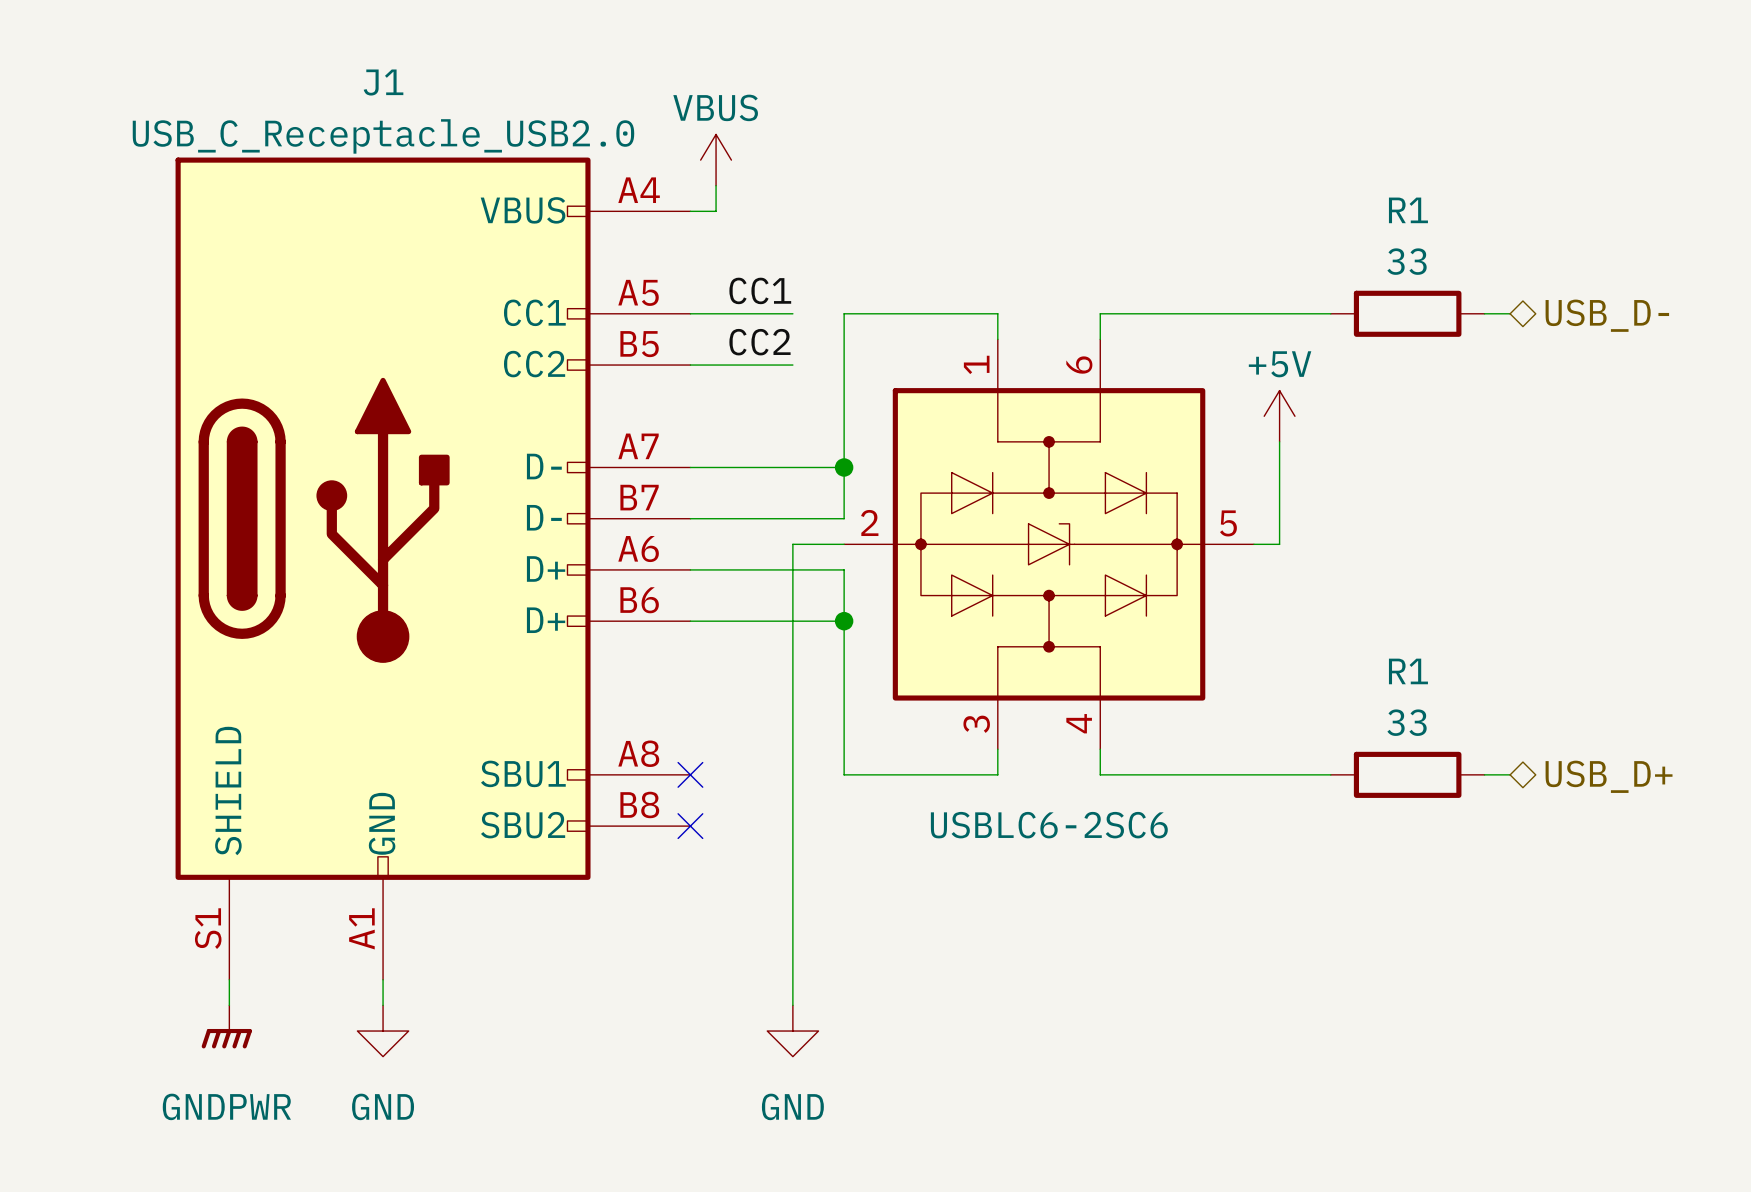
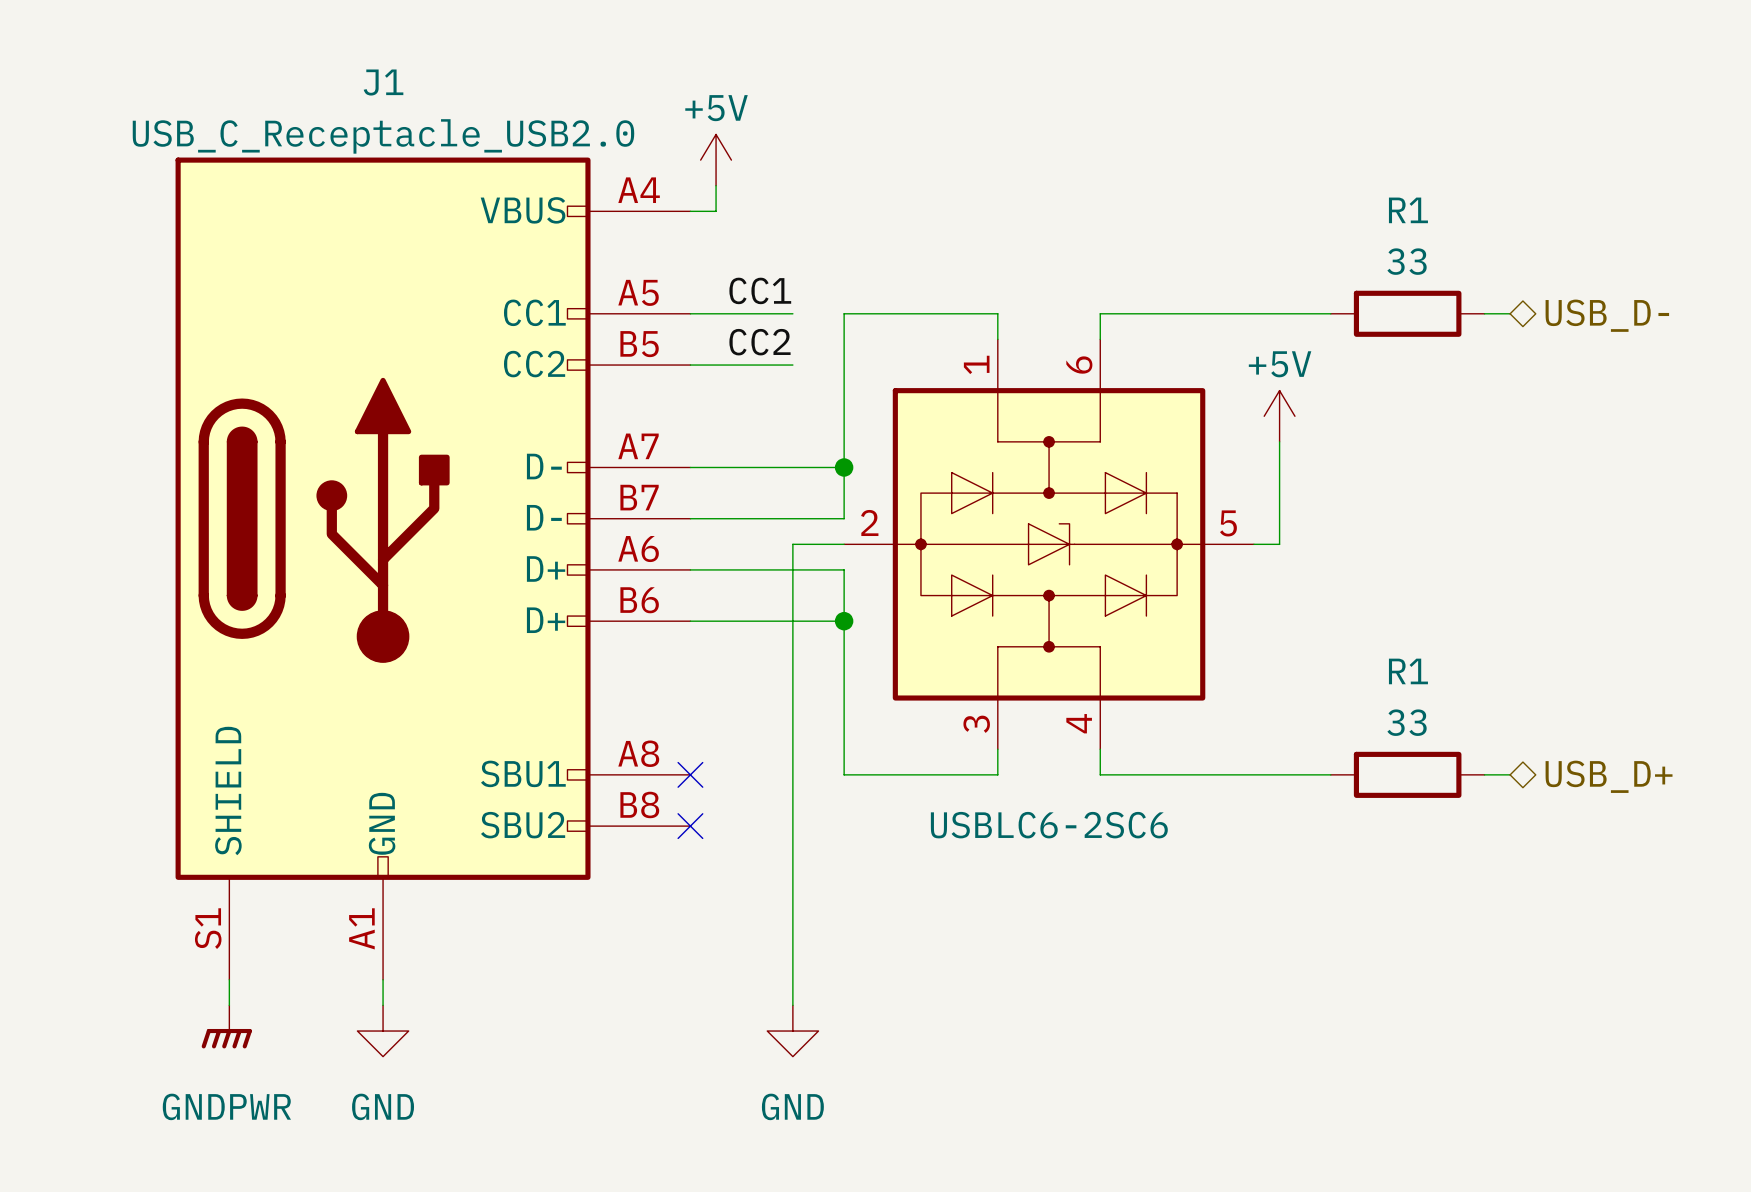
power symbol: VBUS (716, 160) -> +5V (716, 160)

